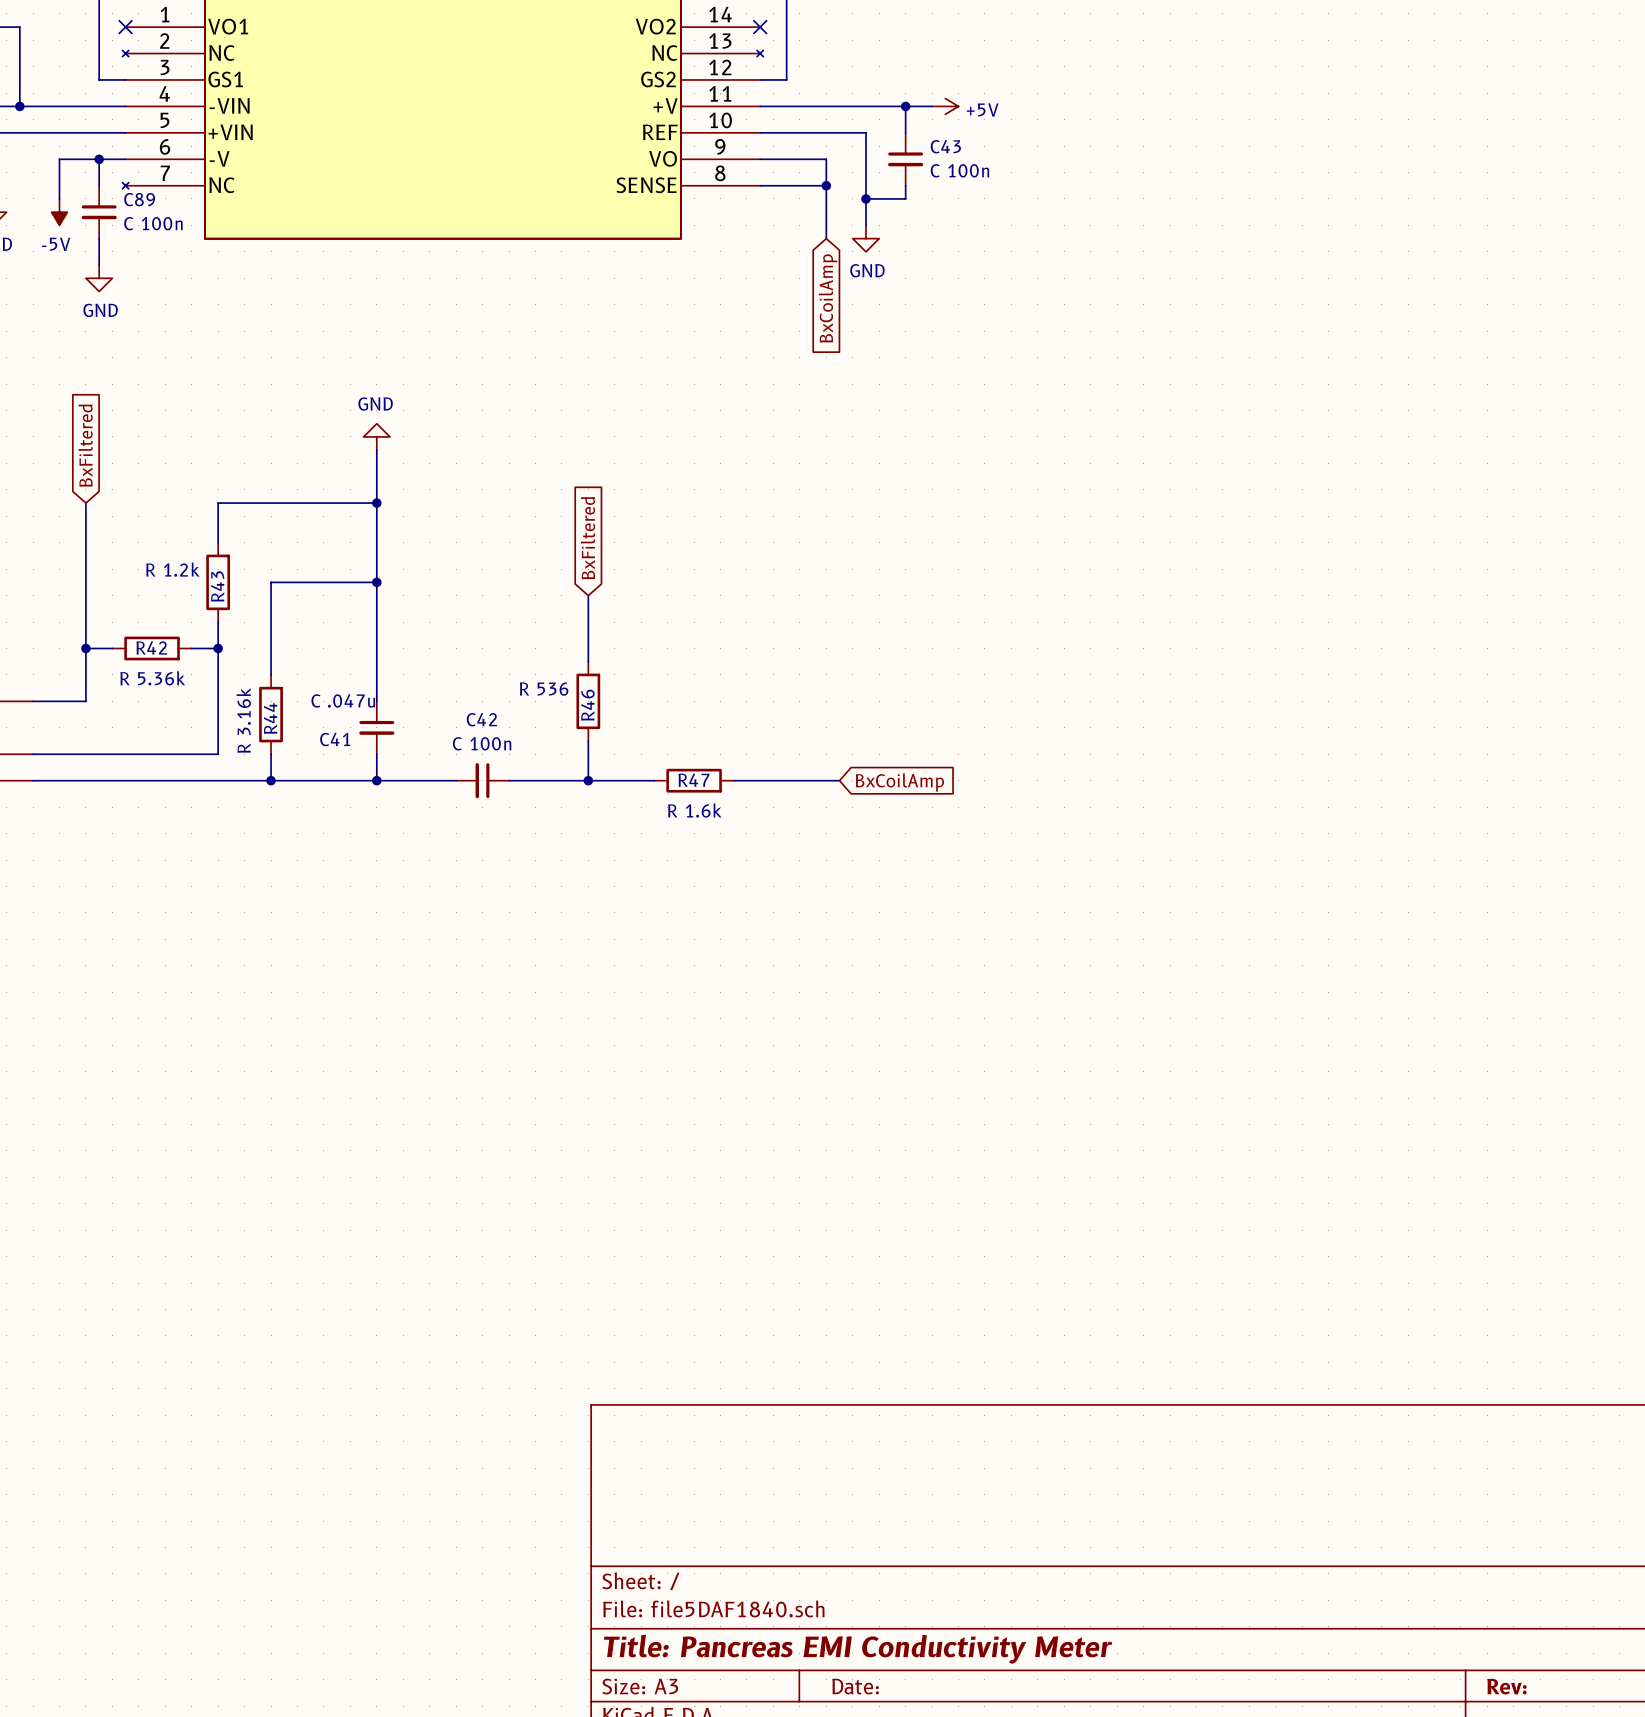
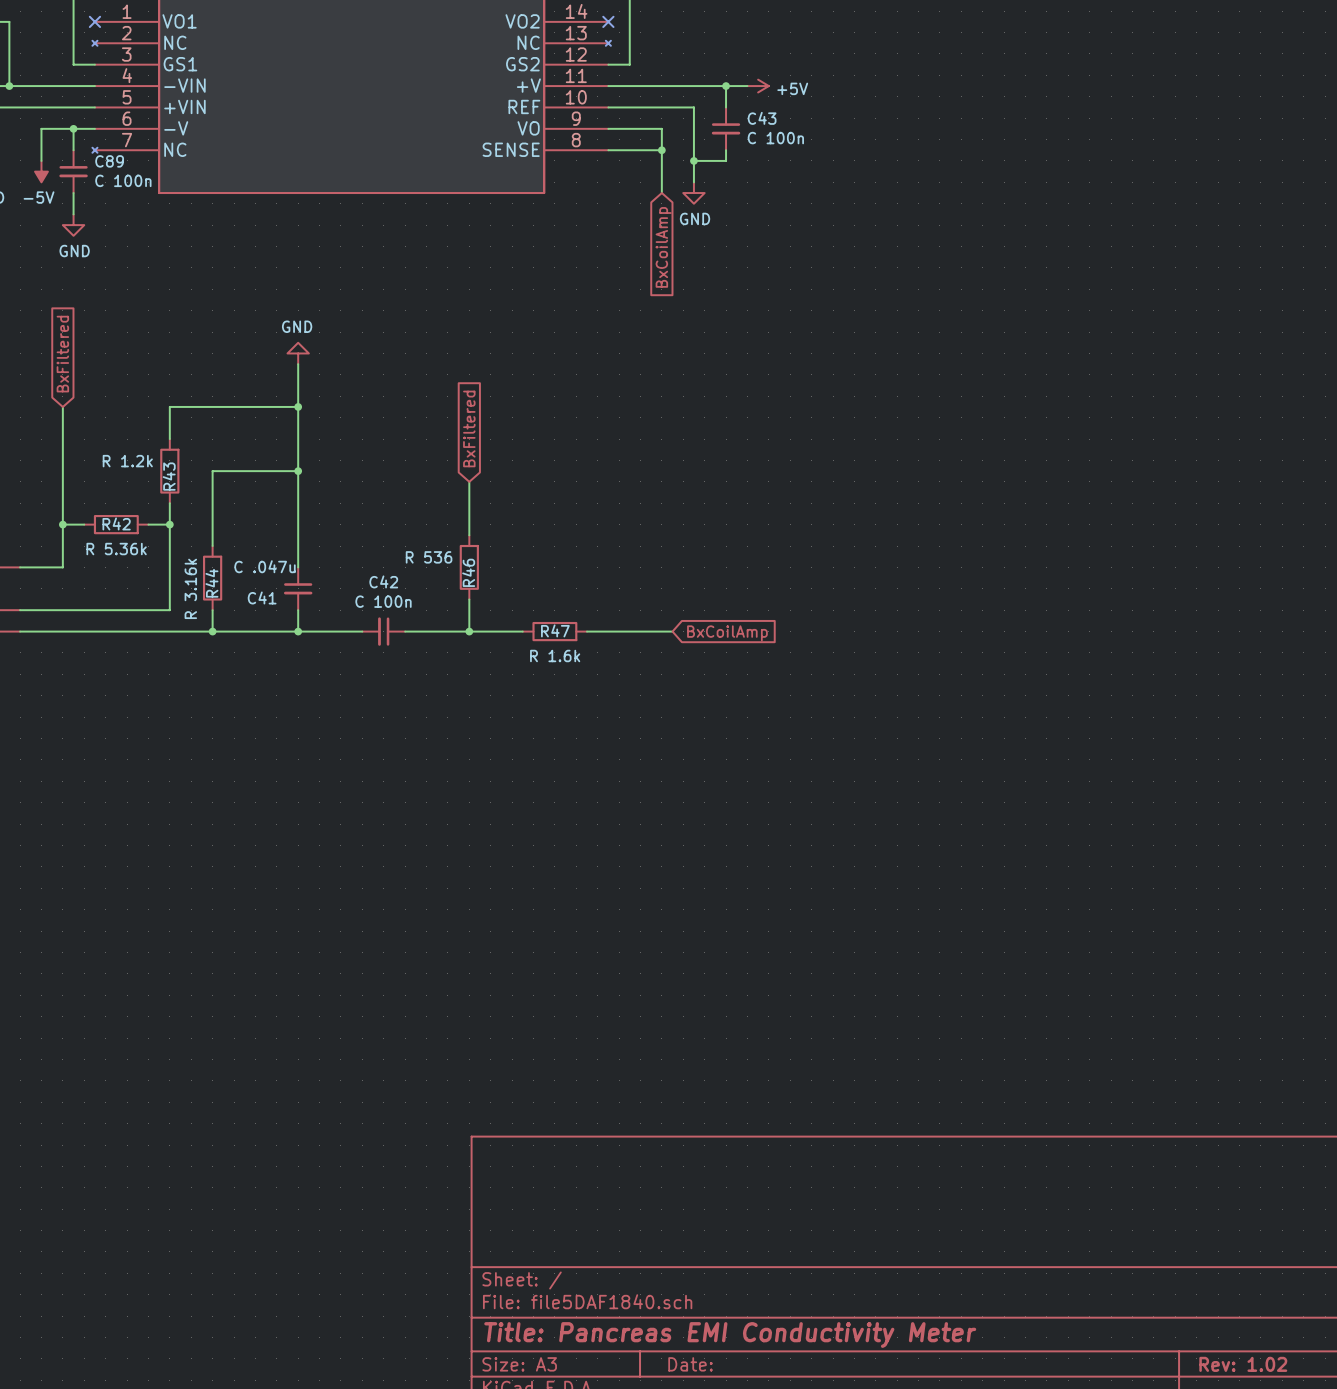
title block: Rev: (1506, 1686) -> Rev: 1.02 (1243, 1364)

